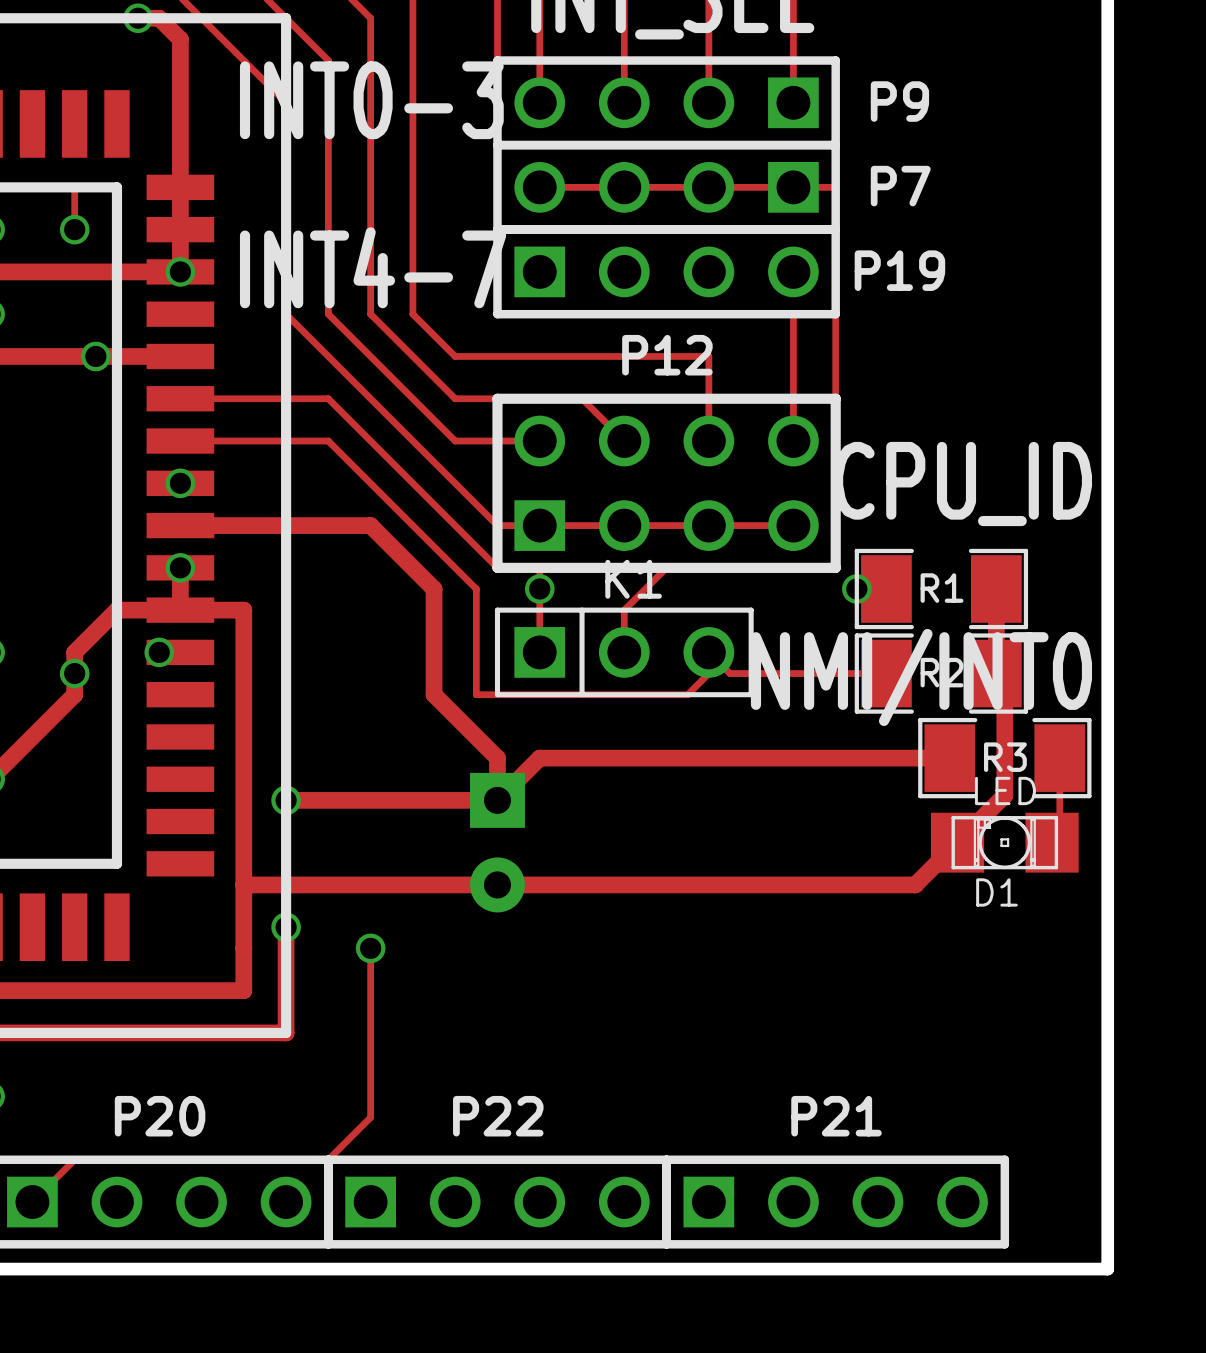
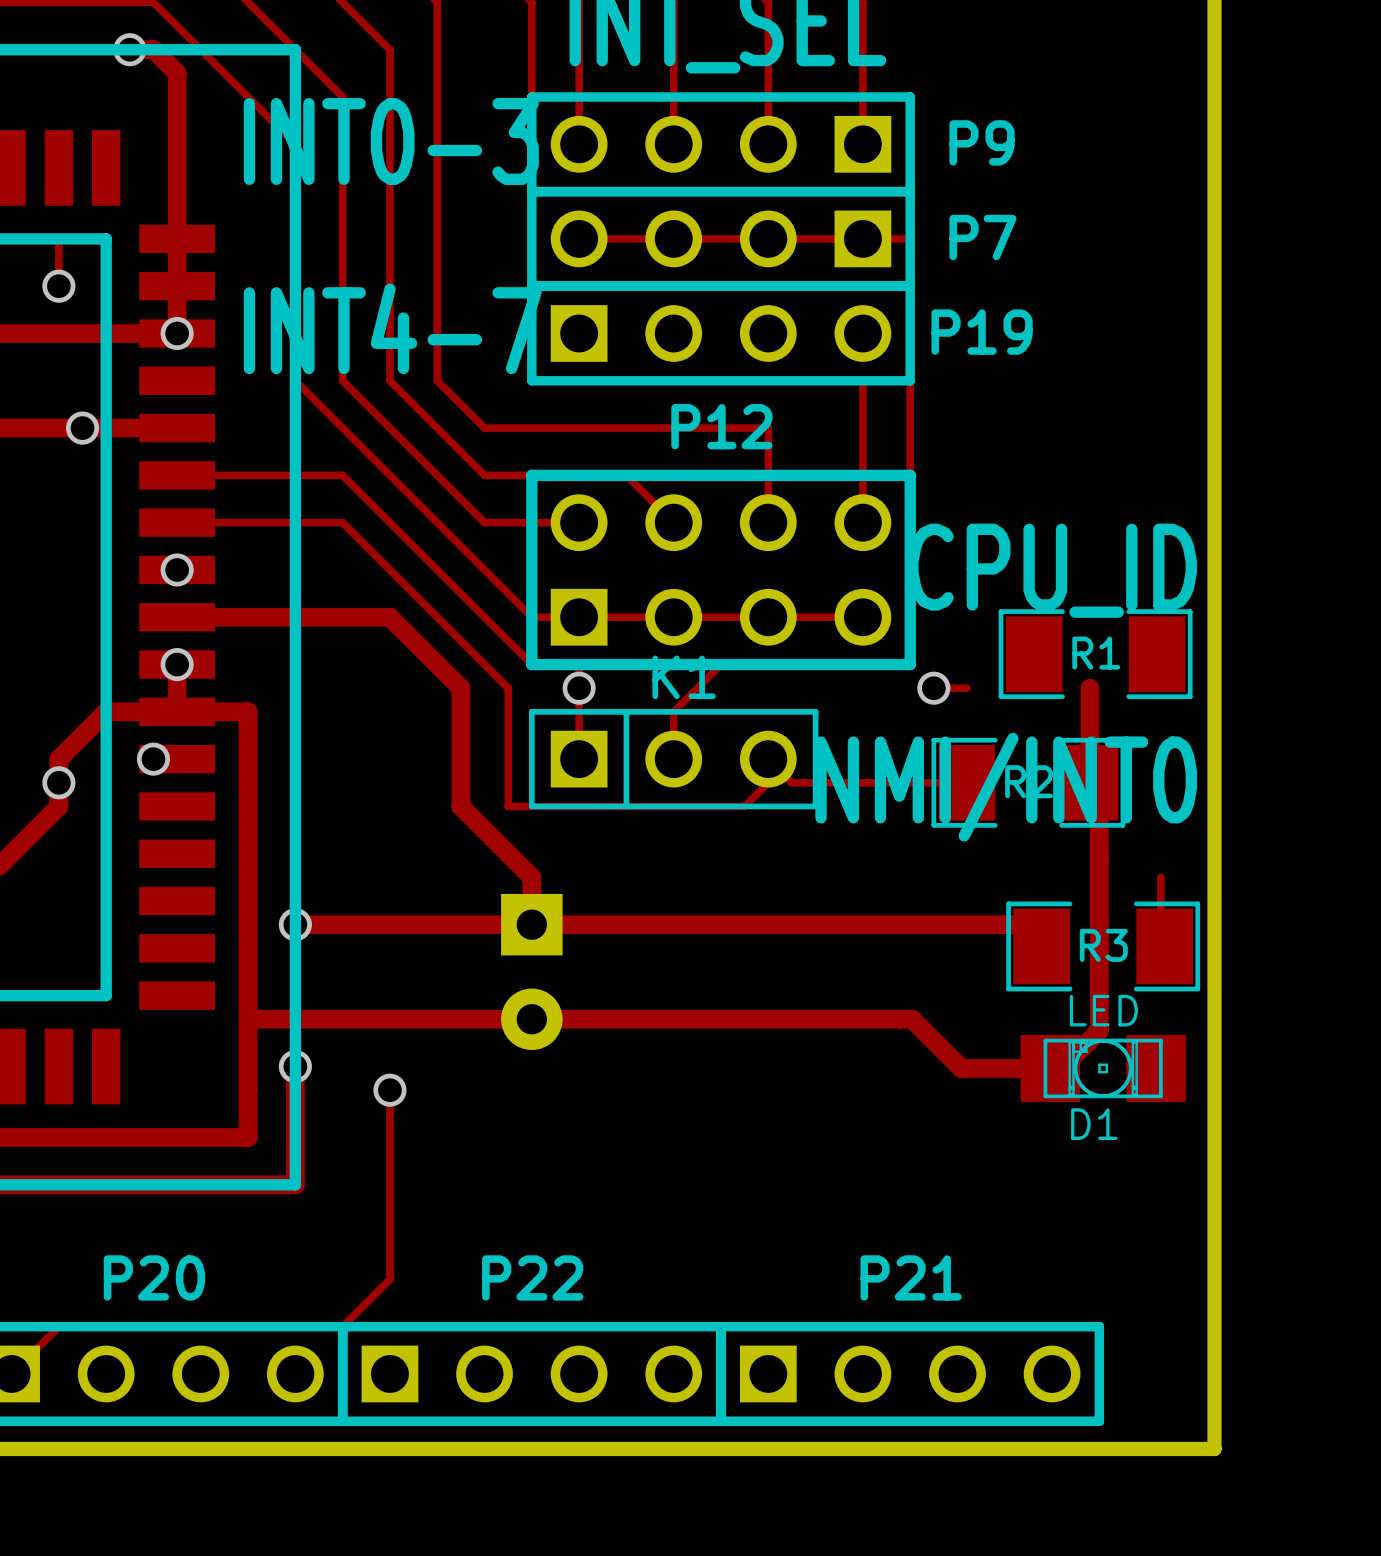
R1 position: (941, 589) -> (1095, 654)
track: (949, 758) (539, 758) (497, 800) -> (1041, 946) (1019, 924) (531, 924)
R3 position: (1004, 758) -> (1103, 946)
track: (1004, 795) (915, 884) (837, 884) -> (1099, 919) (1099, 1030) (1061, 1068) (961, 1068) (912, 1019)
D1 position: (1004, 842) -> (1103, 1068)

